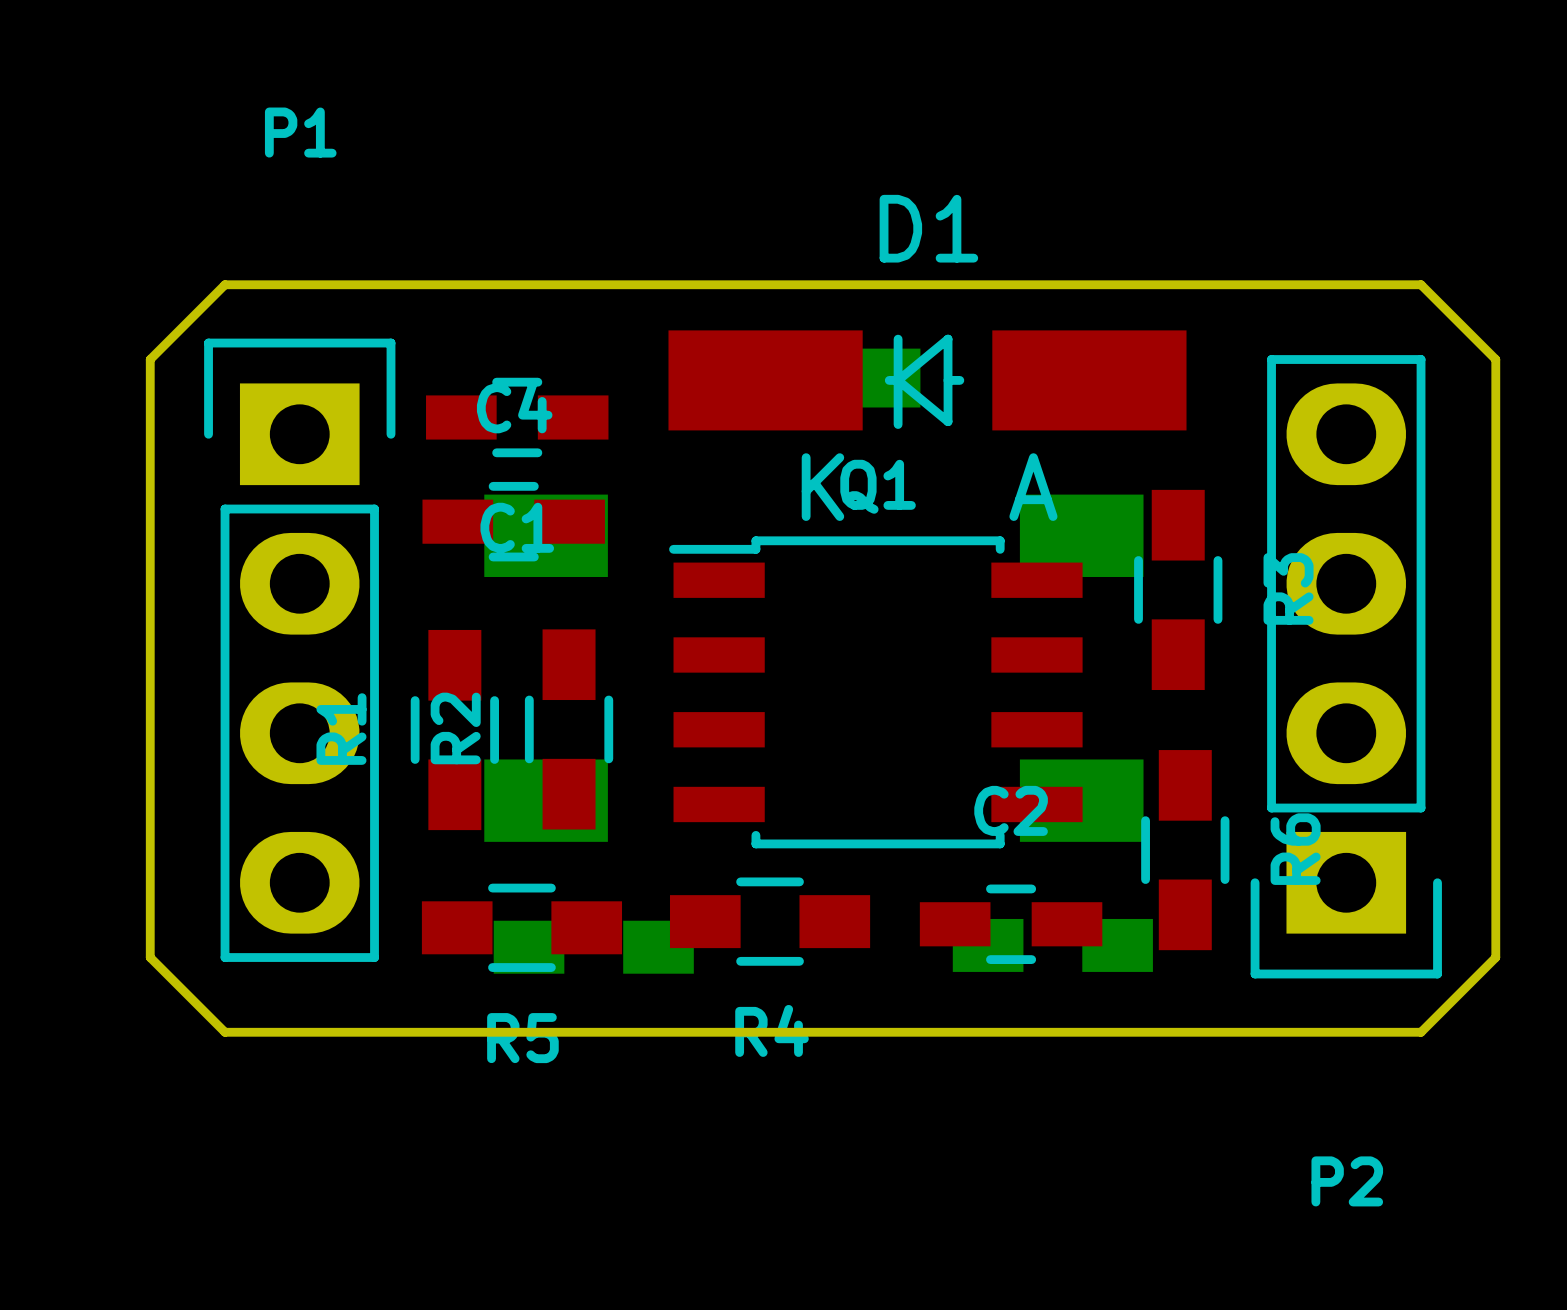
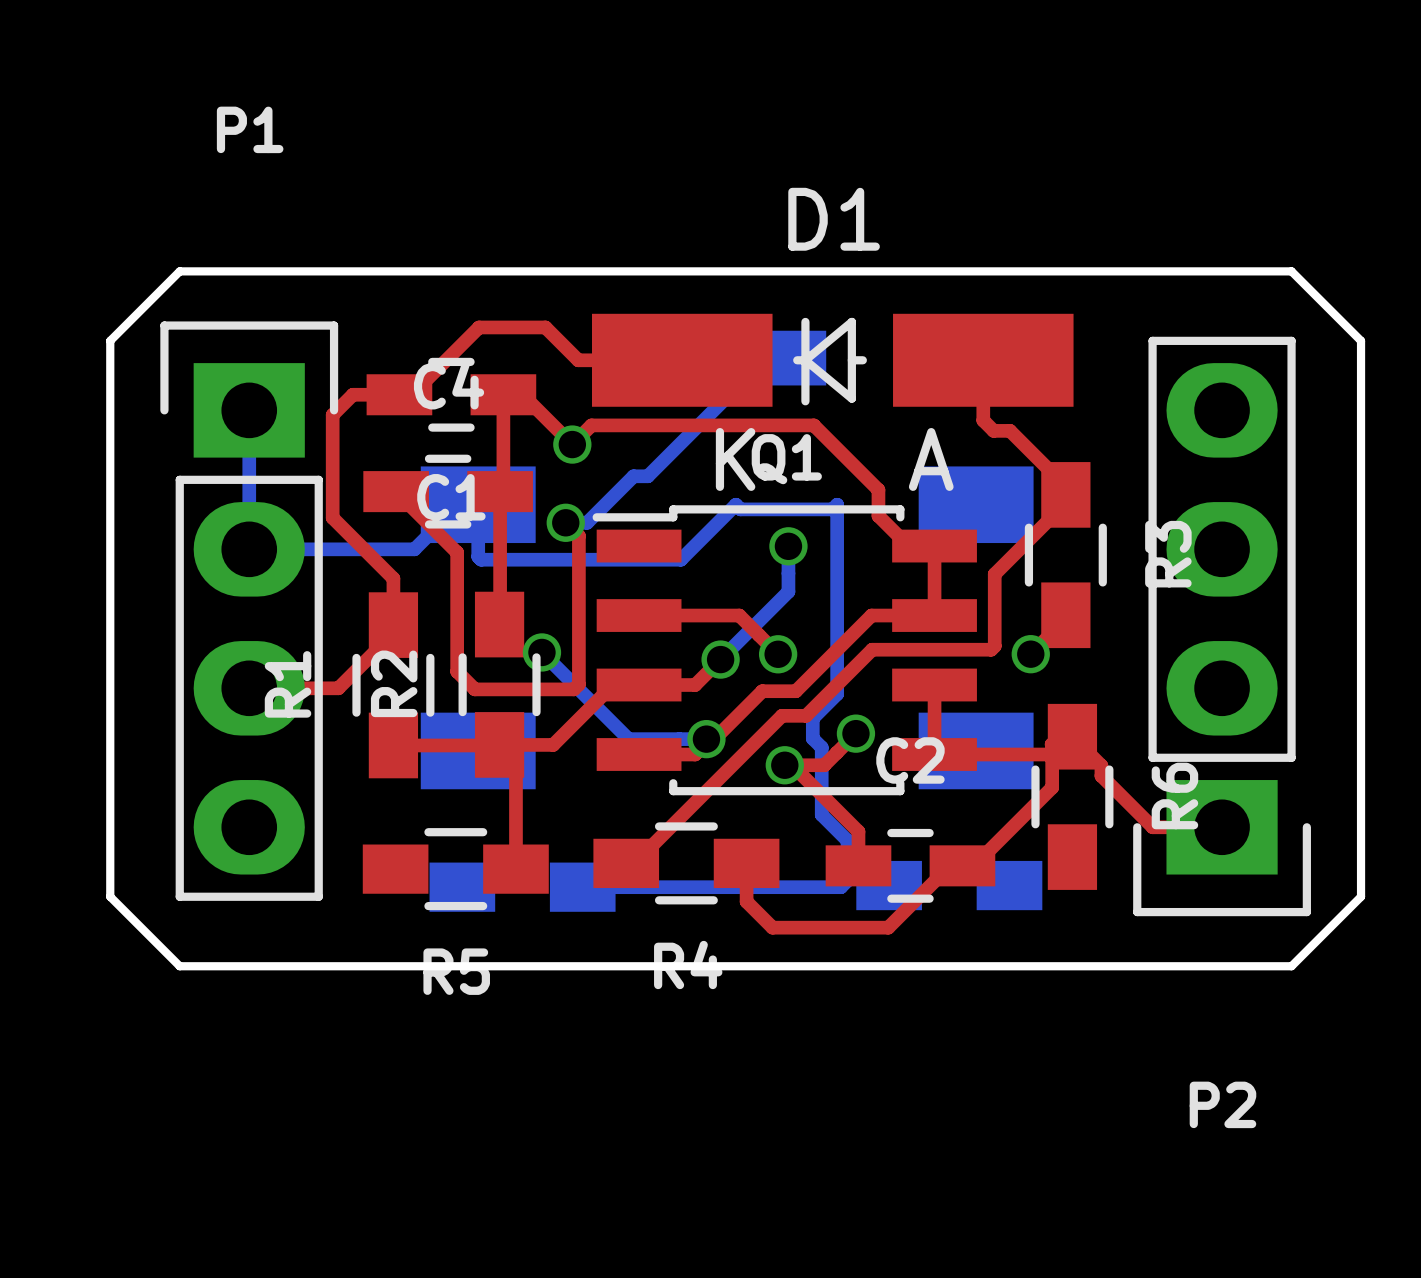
bottom track: none -> (724, 358) (724, 399) (647, 476) (633, 476) (587, 522) (565, 522)
top track: none -> (682, 360) (578, 360) (545, 327) (479, 327) (411, 394) (352, 394) (332, 415) (332, 517) (393, 578) (393, 633) (338, 688) (249, 688)
top track: none -> (983, 360) (983, 420) (993, 430) (1010, 430) (1065, 486) (1065, 503) (994, 574) (994, 646) (991, 649) (872, 649) (806, 715) (781, 715) (634, 863) (626, 863)
bottom track: none -> (249, 410) (249, 547) (253, 552) (249, 549) (414, 549) (465, 498) (478, 504) (478, 556) (481, 559) (680, 559) (735, 504) (740, 509) (832, 509) (837, 504) (837, 694) (812, 718) (812, 738) (821, 747) (821, 814) (847, 840) (847, 880) (840, 887) (582, 887)
via: none -> (572, 444)
top track: none -> (396, 491) (457, 552) (457, 671) (474, 689) (573, 689) (578, 684) (578, 535) (565, 522)
via: none -> (565, 522)
bottom track: none -> (788, 546) (788, 591) (720, 659)
via: none -> (788, 546)
top track: none -> (639, 615) (739, 615) (778, 654)
top track: none -> (500, 624) (500, 491) (503, 488) (503, 394) (522, 394) (572, 444) (591, 425) (813, 425) (878, 489) (878, 515) (908, 546) (934, 546) (934, 615) (871, 615) (795, 691) (762, 691) (714, 739) (706, 739) (706, 743) (695, 754) (639, 754)
bottom track: none -> (541, 652) (628, 739) (706, 739)
via: none -> (541, 652)
via: none -> (778, 654)
via: none -> (1030, 654)
top track: none -> (720, 659) (695, 685) (613, 685) (553, 744) (499, 744) (515, 761) (515, 869)
via: none -> (720, 659)
top track: none -> (934, 685) (934, 754) (1054, 754) (1072, 736)
top track: none -> (855, 733) (824, 765) (784, 765)
via: none -> (855, 733)
top track: none -> (1072, 736) (1101, 765) (1101, 775) (1152, 827) (1222, 827)
via: none -> (706, 739)
top track: none -> (393, 745) (499, 745)
top track: none -> (1052, 744) (1052, 787) (973, 865) (950, 865) (888, 927) (772, 927) (746, 901) (746, 863)
via: none -> (784, 765)
top track: none -> (792, 765) (858, 831) (858, 865)

